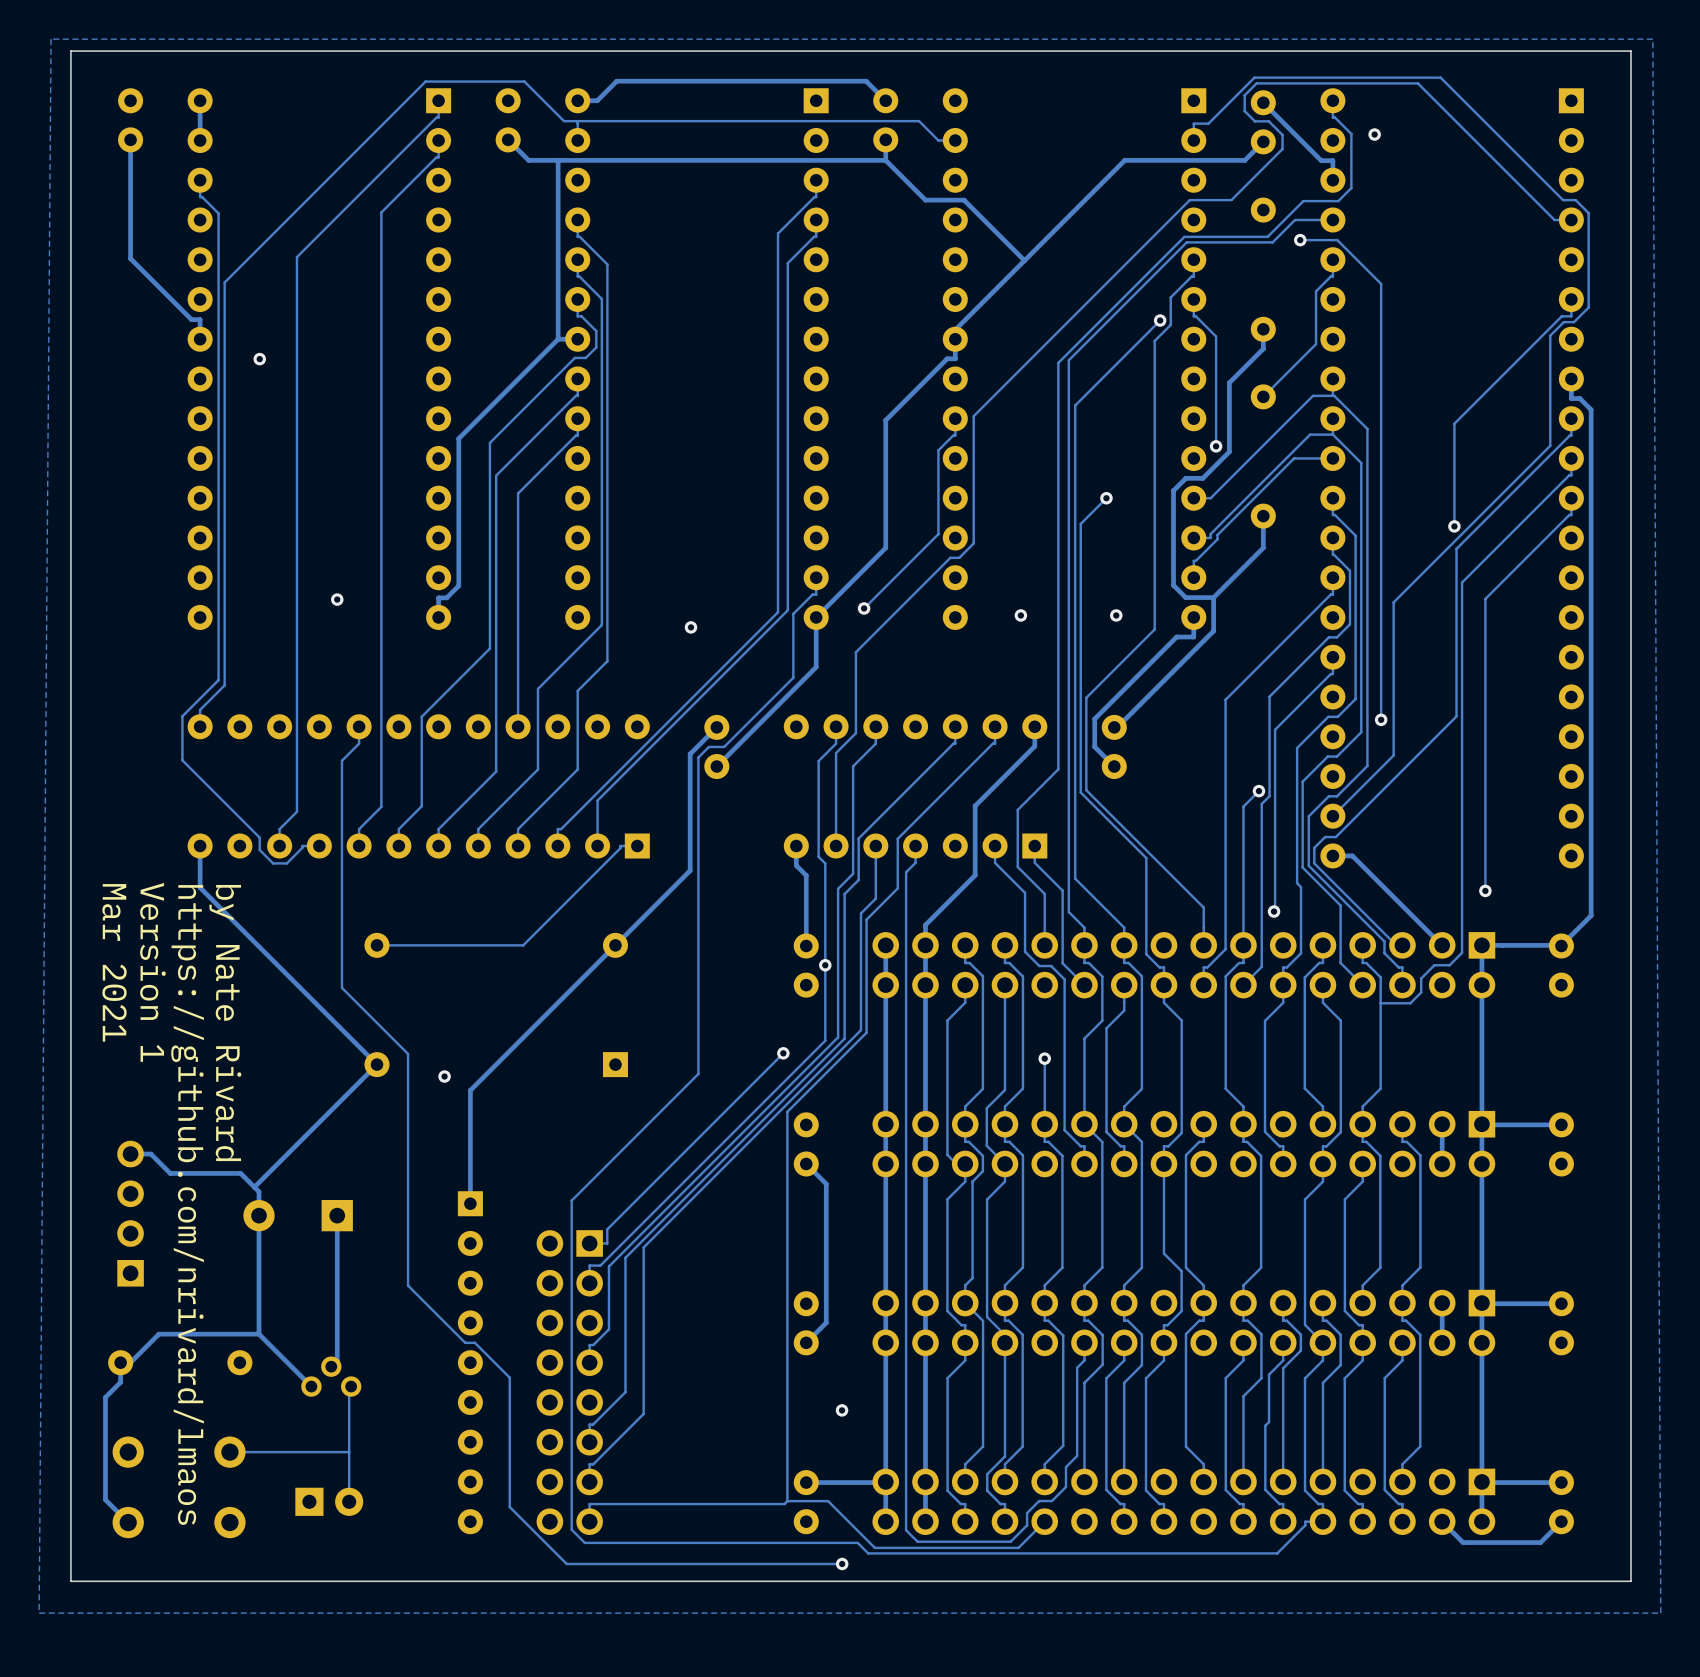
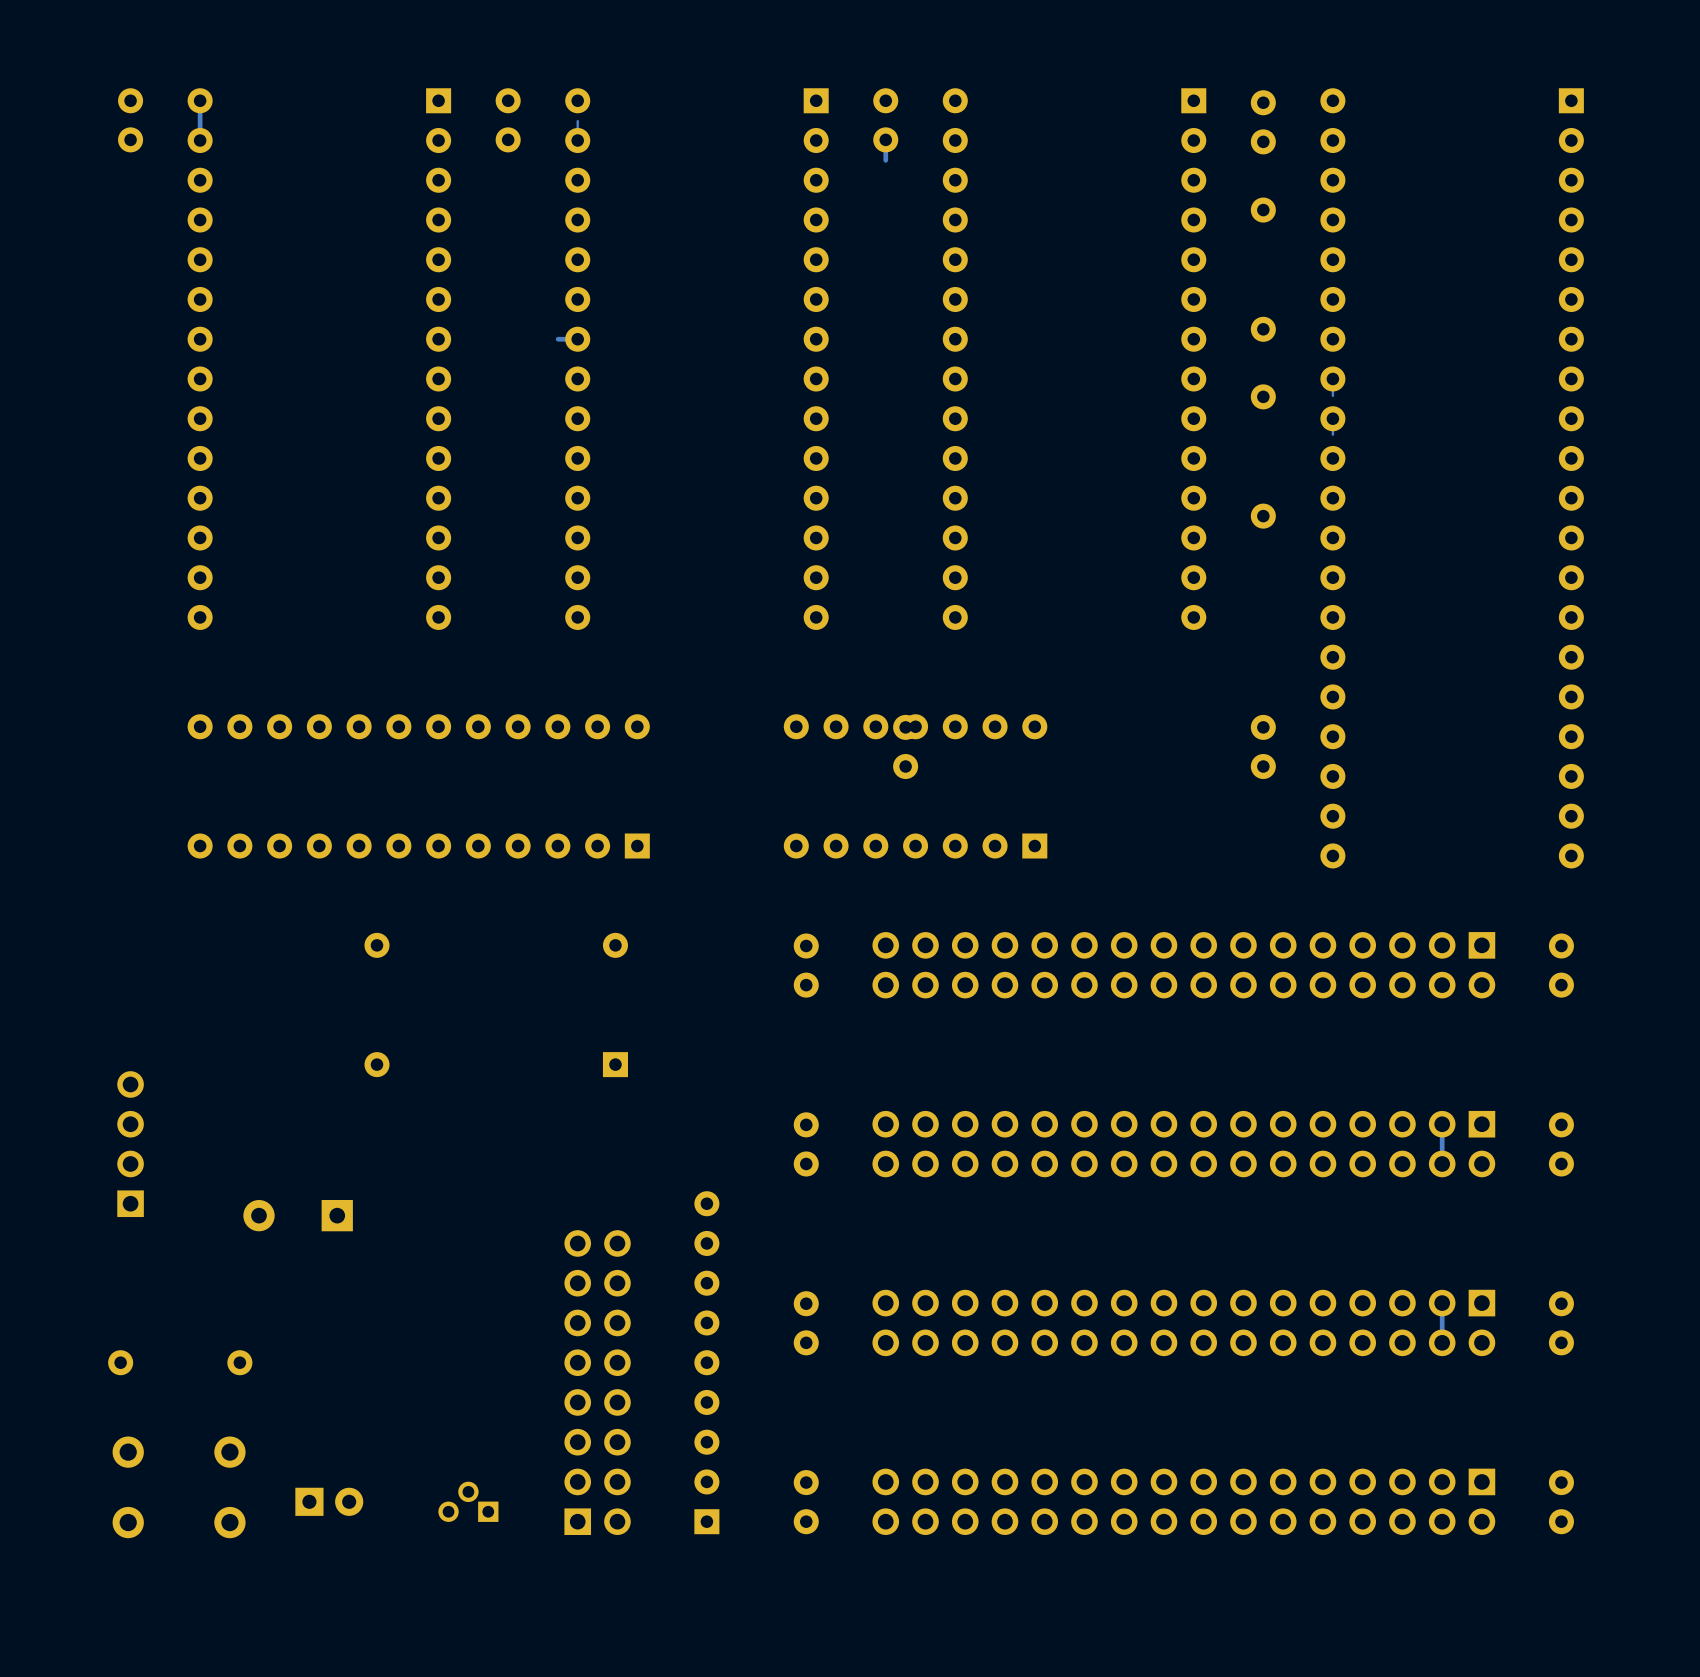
zone outline: (1652, 39) (1660, 1613) (39, 1613) (51, 39) (1652, 39) -> none
board edge: (1630, 51) (70, 51) (70, 1581) (1630, 1581) (1630, 51) -> none
track: (438, 100) (438, 117) (296, 257) (296, 811) (279, 829) (279, 846) -> none
track: (885, 100) (866, 81) (616, 81) (597, 100) (577, 100) -> none
track: (1332, 100) (1332, 117) (1351, 133) (1351, 188) (1338, 201) (1303, 201) (1267, 236) (1184, 236) (1058, 362) (1058, 769) (1017, 809) (1017, 866) (1044, 893) (1044, 945) -> none
track: (1263, 102) (1321, 160) (1332, 160) (1332, 180) -> none
via: (1374, 134) -> none
track: (130, 139) (130, 258) (191, 319) (200, 319) (200, 339) -> none
track: (508, 139) (528, 160) (885, 160) (925, 200) (964, 200) (1024, 260) -> none
track: (438, 140) (438, 157) (381, 212) (381, 806) (359, 829) (359, 846) -> none
track: (955, 140) (938, 140) (919, 121) (564, 121) (524, 81) (425, 81) (224, 282) (224, 685) (200, 709) (200, 726) -> none
track: (1193, 140) (1193, 123) (1208, 123) (1254, 77) (1440, 77) (1563, 200) (1575, 200) (1588, 213) (1588, 307) (1574, 322) (1563, 322) (1550, 335) (1550, 445) (1393, 602) (1393, 755) (1332, 816) -> none
track: (1263, 141) (1244, 160) (1124, 160) (955, 329) (955, 358) (947, 358) (885, 420) (885, 547) (816, 617) (816, 667) (716, 766) -> none
track: (558, 160) (558, 339) (458, 438) (458, 585) (446, 597) (438, 597) (438, 617) -> none
track: (200, 180) (200, 197) (218, 213) (218, 680) (182, 716) (182, 760) (259, 837) (259, 850) (273, 863) (286, 863) (302, 846) (319, 846) -> none
track: (816, 180) (816, 197) (778, 233) (778, 612) (561, 829) (557, 829) (557, 846) -> none
track: (577, 220) (577, 236) (607, 264) (607, 661) (577, 690) (577, 769) (518, 829) (518, 846) -> none
track: (816, 220) (816, 236) (787, 263) (787, 610) (597, 800) (597, 846) -> none
track: (1332, 220) (1295, 220) (1272, 242) (1186, 242) (1068, 360) (1068, 912) (1084, 927) (1084, 963) (1088, 963) (1102, 976) (1102, 1020) (1084, 1038) (1084, 1124) (1102, 1142) (1102, 1267) (1084, 1285) (1084, 1320) (1088, 1320) (1102, 1335) (1102, 1364) (1084, 1382) (1084, 1481) -> none
track: (1571, 220) (1554, 220) (1417, 83) (1256, 83) (1244, 95) (1244, 111) (1254, 121) (1268, 121) (1282, 135) (1282, 149) (1231, 200) (1189, 200) (973, 416) (973, 543) (959, 557) (950, 557) (855, 652) (855, 733) (836, 753) (836, 846) -> none
track: (1300, 240) (1337, 240) (1381, 283) (1381, 719) -> none
via: (1300, 240) -> none
track: (577, 259) (577, 276) (601, 298) (601, 625) (537, 688) (537, 769) (478, 829) (478, 846) -> none
track: (1193, 259) (1193, 276) (1170, 297) (1170, 324) (1154, 340) (1154, 629) (1086, 697) (1086, 790) (1203, 907) (1203, 945) -> none
track: (1332, 259) (1332, 276) (1316, 291) (1316, 344) (1263, 396) -> none
track: (577, 299) (577, 316) (581, 316) (596, 331) (596, 347) (585, 357) (574, 357) (489, 442) (489, 648) (421, 716) (421, 806) (398, 829) (398, 846) -> none
track: (1193, 299) (1193, 316) (1216, 336) (1216, 446) -> none
track: (1571, 299) (1571, 316) (1561, 316) (1454, 423) (1454, 526) -> none
track: (1160, 320) (1075, 405) (1075, 878) (1124, 927) (1124, 963) (1128, 963) (1141, 976) (1141, 1088) (1124, 1106) (1124, 1124) (1141, 1141) (1141, 1267) (1124, 1285) (1124, 1320) (1127, 1320) (1141, 1334) (1141, 1365) (1124, 1382) (1124, 1481) -> none
via: (1160, 320) -> none
track: (1263, 329) (1263, 348) (1229, 382) (1229, 451) (1202, 478) (1185, 478) (1173, 490) (1173, 585) (1185, 597) (1213, 597) -> none
via: (259, 359) -> none
track: (577, 378) (577, 395) (496, 475) (496, 771) (438, 829) (438, 846) -> none
track: (1571, 378) (1571, 398) (1579, 398) (1591, 409) (1591, 915) (1561, 945) -> none
track: (577, 418) (577, 435) (518, 493) (518, 726) -> none
track: (955, 418) (955, 435) (938, 450) (938, 534) (864, 608) -> none
track: (1571, 418) (1571, 435) (1456, 548) (1456, 716) (1335, 837) (1325, 837) (1314, 847) (1314, 863) (1396, 945) (1402, 945) -> none
via: (1216, 446) -> none
track: (1332, 458) (1294, 458) (1217, 535) (1217, 539) (1193, 560) (1193, 577) -> none
track: (1571, 458) (1571, 475) (1462, 582) (1462, 952) (1449, 965) (1434, 965) (1421, 978) (1421, 992) (1410, 1003) (1380, 1003) -> none
track: (1106, 498) (1080, 523) (1080, 792) (1146, 858) (1146, 954) (1159, 967) (1163, 967) (1163, 1002) (1181, 1020) (1181, 1133) (1168, 1146) (1163, 1146) (1163, 1253) (1181, 1271) (1181, 1311) (1167, 1325) (1163, 1325) (1163, 1360) (1146, 1378) (1146, 1490) (1159, 1504) (1163, 1504) (1163, 1521) -> none
via: (1106, 498) -> none
track: (1193, 498) (1210, 498) (1313, 395) (1334, 395) (1367, 428) (1367, 765) (1337, 796) (1328, 796) (1308, 816) (1308, 865) (1384, 941) (1384, 953) (1398, 967) (1402, 967) (1402, 985) -> none
track: (1332, 498) (1332, 515) (1355, 535) (1355, 699) (1337, 716) (1328, 716) (1297, 748) (1297, 883) (1301, 887) (1301, 953) (1286, 967) (1283, 967) (1283, 1002) (1265, 1020) (1265, 1131) (1279, 1146) (1283, 1146) (1283, 1163) -> none
track: (1571, 498) (1571, 515) (1485, 598) (1485, 890) -> none
track: (1263, 516) (1263, 547) (1213, 597) -> none
via: (1454, 526) -> none
track: (1193, 537) (1210, 537) (1210, 534) (1310, 434) (1332, 434) (1361, 463) (1361, 732) (1336, 756) (1327, 756) (1302, 781) (1302, 867) (1340, 905) (1340, 963) (1362, 985) -> none
track: (1332, 537) (1332, 554) (1349, 570) (1349, 624) (1337, 637) (1328, 637) (1269, 696) (1269, 796) (1261, 804) (1261, 966) (1243, 985) -> none
track: (816, 577) (816, 594) (812, 594) (793, 613) (793, 677) (724, 746) (708, 746) (698, 757) (698, 1073) (571, 1200) (571, 1529) (584, 1542) (857, 1542) (868, 1553) (1277, 1553) (1305, 1525) (1305, 1521) (1322, 1521) (1322, 1504) (1318, 1504) (1305, 1490) (1305, 1378) (1322, 1360) (1322, 1342) (1305, 1324) (1305, 1199) (1322, 1181) (1322, 1146) (1326, 1146) (1340, 1132) (1340, 1020) (1322, 1002) (1322, 985) -> none
track: (1332, 577) (1332, 594) (1225, 699) (1225, 949) (1207, 967) (1203, 967) (1203, 985) -> none
track: (1213, 597) (1213, 631) (1117, 727) (1114, 727) -> none
via: (337, 599) -> none
via: (864, 608) -> none
via: (1020, 615) -> none
via: (1116, 615) -> none
track: (1193, 617) (1193, 637) (1176, 637) (1094, 718) (1094, 746) (1114, 766) -> none
via: (690, 627) -> none
track: (1332, 657) (1332, 674) (1275, 729) (1274, 911) -> none
via: (1381, 719) -> none
track: (359, 726) (359, 743) (341, 760) (341, 987) (408, 1053) (408, 1285) (465, 1342) (474, 1342) (509, 1377) (509, 1507) (566, 1563) (842, 1563) -> none
track: (836, 726) (836, 743) (818, 761) (818, 856) (825, 863) (825, 1040) (600, 1265) (589, 1265) (589, 1283) -> none
track: (875, 726) (875, 743) (853, 766) (853, 873) (838, 888) (838, 1037) (608, 1266) (608, 1329) (593, 1345) (589, 1345) (589, 1362) -> none
track: (955, 726) (955, 743) (858, 838) (858, 879) (844, 894) (844, 1038) (625, 1257) (625, 1392) (593, 1424) (589, 1424) (589, 1442) -> none
track: (995, 726) (995, 743) (897, 838) (897, 888) (866, 919) (866, 1032) (787, 1111) (787, 1501) -> none
track: (1034, 726) (1034, 746) (975, 805) (975, 875) (925, 925) (925, 1521) -> none
track: (716, 727) (690, 754) (690, 870) (470, 1090) (470, 1203) -> none
part: (716, 746) -> none
part: none -> (905, 746)
part: (1114, 746) -> none
part: none -> (1263, 746)
track: (1258, 791) (1243, 806) (1243, 963) (1239, 963) (1225, 976) (1225, 1088) (1243, 1106) (1243, 1141) (1247, 1141) (1261, 1155) (1261, 1267) (1243, 1285) (1243, 1320) (1247, 1320) (1261, 1334) (1261, 1378) (1243, 1396) (1243, 1481) -> none
via: (1258, 791) -> none
track: (200, 846) (200, 887) (376, 1064) (254, 1187) -> none
track: (637, 846) (620, 846) (523, 945) (376, 945) -> none
track: (796, 846) (796, 865) (806, 875) (806, 945) -> none
track: (875, 846) (875, 898) (861, 913) (861, 1030) (643, 1247) (643, 1413) (593, 1464) (589, 1464) (589, 1481) -> none
track: (915, 846) (915, 862) (906, 872) (906, 1530) (917, 1541) (1010, 1541) (1027, 1525) (1027, 1513) (1039, 1501) (1051, 1501) (1065, 1486) (1065, 1467) (1077, 1455) (1077, 1367) (1084, 1360) (1084, 1342) -> none
track: (995, 846) (995, 862) (1025, 892) (1025, 951) (1039, 966) (1051, 966) (1064, 979) (1064, 1130) (1080, 1146) (1084, 1146) (1084, 1163) -> none
track: (1034, 846) (1034, 862) (1062, 890) (1062, 963) (1084, 985) -> none
track: (1332, 855) (1352, 855) (1441, 945) -> none
via: (1485, 890) -> none
via: (1274, 911) -> none
track: (885, 945) (885, 1521) -> none
track: (965, 945) (965, 963) (969, 963) (982, 976) (982, 1088) (965, 1106) (965, 1141) (968, 1141) (982, 1155) (982, 1171) (972, 1181) (972, 1278) (965, 1285) (965, 1303) (983, 1320) (983, 1446) (965, 1464) (965, 1481) -> none
track: (1004, 945) (1004, 963) (1009, 963) (1022, 976) (1022, 1088) (1004, 1106) (1004, 1141) (1009, 1141) (1022, 1155) (1022, 1267) (1004, 1285) (1004, 1320) (1008, 1320) (1022, 1334) (1022, 1446) (1004, 1464) (1004, 1481) -> none
track: (1322, 945) (1322, 963) (1319, 963) (1304, 977) (1304, 1088) (1322, 1106) (1322, 1124) -> none
track: (1362, 945) (1362, 963) (1366, 963) (1380, 977) (1380, 1088) (1362, 1106) (1362, 1141) (1366, 1141) (1380, 1155) (1380, 1267) (1362, 1285) (1362, 1303) -> none
track: (1561, 945) (1481, 945) (1481, 1521) -> none
text: Mar 2021 (114, 962) -> none
via: (825, 965) -> none
text: Version 1 (152, 972) -> none
track: (965, 985) (965, 1002) (947, 1020) (947, 1154) (965, 1172) -> none
track: (1004, 985) (1004, 1090) (986, 1108) (986, 1145) (1004, 1163) (1004, 1181) (987, 1199) (987, 1317) (1004, 1334) (1004, 1456) (987, 1474) (987, 1490) (1000, 1504) (1004, 1504) (1004, 1521) -> none
track: (1124, 985) (1124, 1010) (1106, 1028) (1106, 1131) (1120, 1146) (1124, 1146) (1124, 1163) -> none
text: by Nate Rivard (225, 1023) -> none
track: (783, 1053) (607, 1229) (607, 1243) (589, 1243) -> none
via: (783, 1053) -> none
track: (1044, 1058) (1044, 1141) (1048, 1141) (1062, 1155) (1062, 1267) (1044, 1285) (1044, 1320) (1048, 1320) (1063, 1335) (1063, 1445) (1044, 1464) (1044, 1481) -> none
via: (1044, 1058) -> none
via: (444, 1076) -> none
track: (1203, 1124) (1203, 1141) (1199, 1141) (1185, 1155) (1185, 1267) (1203, 1285) (1203, 1320) (1199, 1320) (1185, 1334) (1185, 1446) (1203, 1464) (1203, 1481) -> none
track: (1402, 1124) (1402, 1141) (1406, 1141) (1420, 1155) (1420, 1267) (1402, 1285) (1402, 1320) (1406, 1320) (1420, 1334) (1420, 1446) (1402, 1464) (1402, 1481) -> none
track: (1561, 1124) (1481, 1124) -> none
track: (130, 1154) (150, 1154) (170, 1173) (240, 1173) (259, 1191) (259, 1334) -> none
track: (806, 1163) (826, 1183) (826, 1322) (806, 1342) -> none
track: (965, 1163) (965, 1181) (947, 1199) (947, 1311) (961, 1325) (965, 1325) (965, 1360) (947, 1378) (947, 1490) (960, 1504) (965, 1504) (965, 1521) -> none
track: (1362, 1163) (1362, 1181) (1344, 1199) (1344, 1311) (1359, 1325) (1362, 1325) (1362, 1360) (1344, 1378) (1344, 1490) (1358, 1504) (1362, 1504) (1362, 1521) -> none
text: https://github.com/nrivard/lmaos (187, 1204) -> none
part position: (130, 1213) -> (130, 1144)
track: (337, 1215) (337, 1360) (331, 1366) -> none
track: (1283, 1303) (1283, 1320) (1286, 1320) (1300, 1334) (1300, 1350) (1283, 1368) (1283, 1481) -> none
track: (1322, 1303) (1322, 1320) (1326, 1320) (1340, 1334) (1340, 1365) (1322, 1382) (1322, 1481) -> none
track: (1561, 1303) (1481, 1303) -> none
track: (259, 1334) (311, 1386) -> none
track: (259, 1334) (158, 1334) (120, 1372) -> none
track: (1124, 1342) (1124, 1360) (1106, 1378) (1106, 1489) (1120, 1504) (1124, 1504) (1124, 1521) -> none
track: (1243, 1342) (1243, 1360) (1225, 1378) (1225, 1490) (1239, 1504) (1243, 1504) (1243, 1521) -> none
track: (1283, 1342) (1283, 1360) (1269, 1374) (1269, 1422) (1265, 1425) (1265, 1489) (1279, 1504) (1283, 1504) (1283, 1521) -> none
track: (1402, 1342) (1402, 1360) (1384, 1378) (1384, 1490) (1398, 1504) (1402, 1504) (1402, 1521) -> none
track: (120, 1362) (120, 1382) (105, 1397) (105, 1499) (128, 1522) -> none
part rotation: 0° (470, 1362) -> 180° (706, 1362)
part position: (470, 1362) -> (706, 1362)
part: (331, 1376) -> none
part rotation: 0° (569, 1382) -> 180° (597, 1382)
track: (351, 1386) (349, 1388) (349, 1501) -> none
via: (842, 1410) -> none
track: (349, 1452) (229, 1452) -> none
track: (885, 1482) (806, 1482) -> none
track: (1561, 1482) (1481, 1482) -> none
part: none -> (468, 1501)
track: (787, 1501) (828, 1501) (874, 1547) (1018, 1547) (1044, 1521) -> none
track: (787, 1501) (784, 1504) (589, 1504) (589, 1521) -> none
track: (1561, 1521) (1540, 1542) (1463, 1542) (1442, 1521) -> none
via: (842, 1563) -> none

